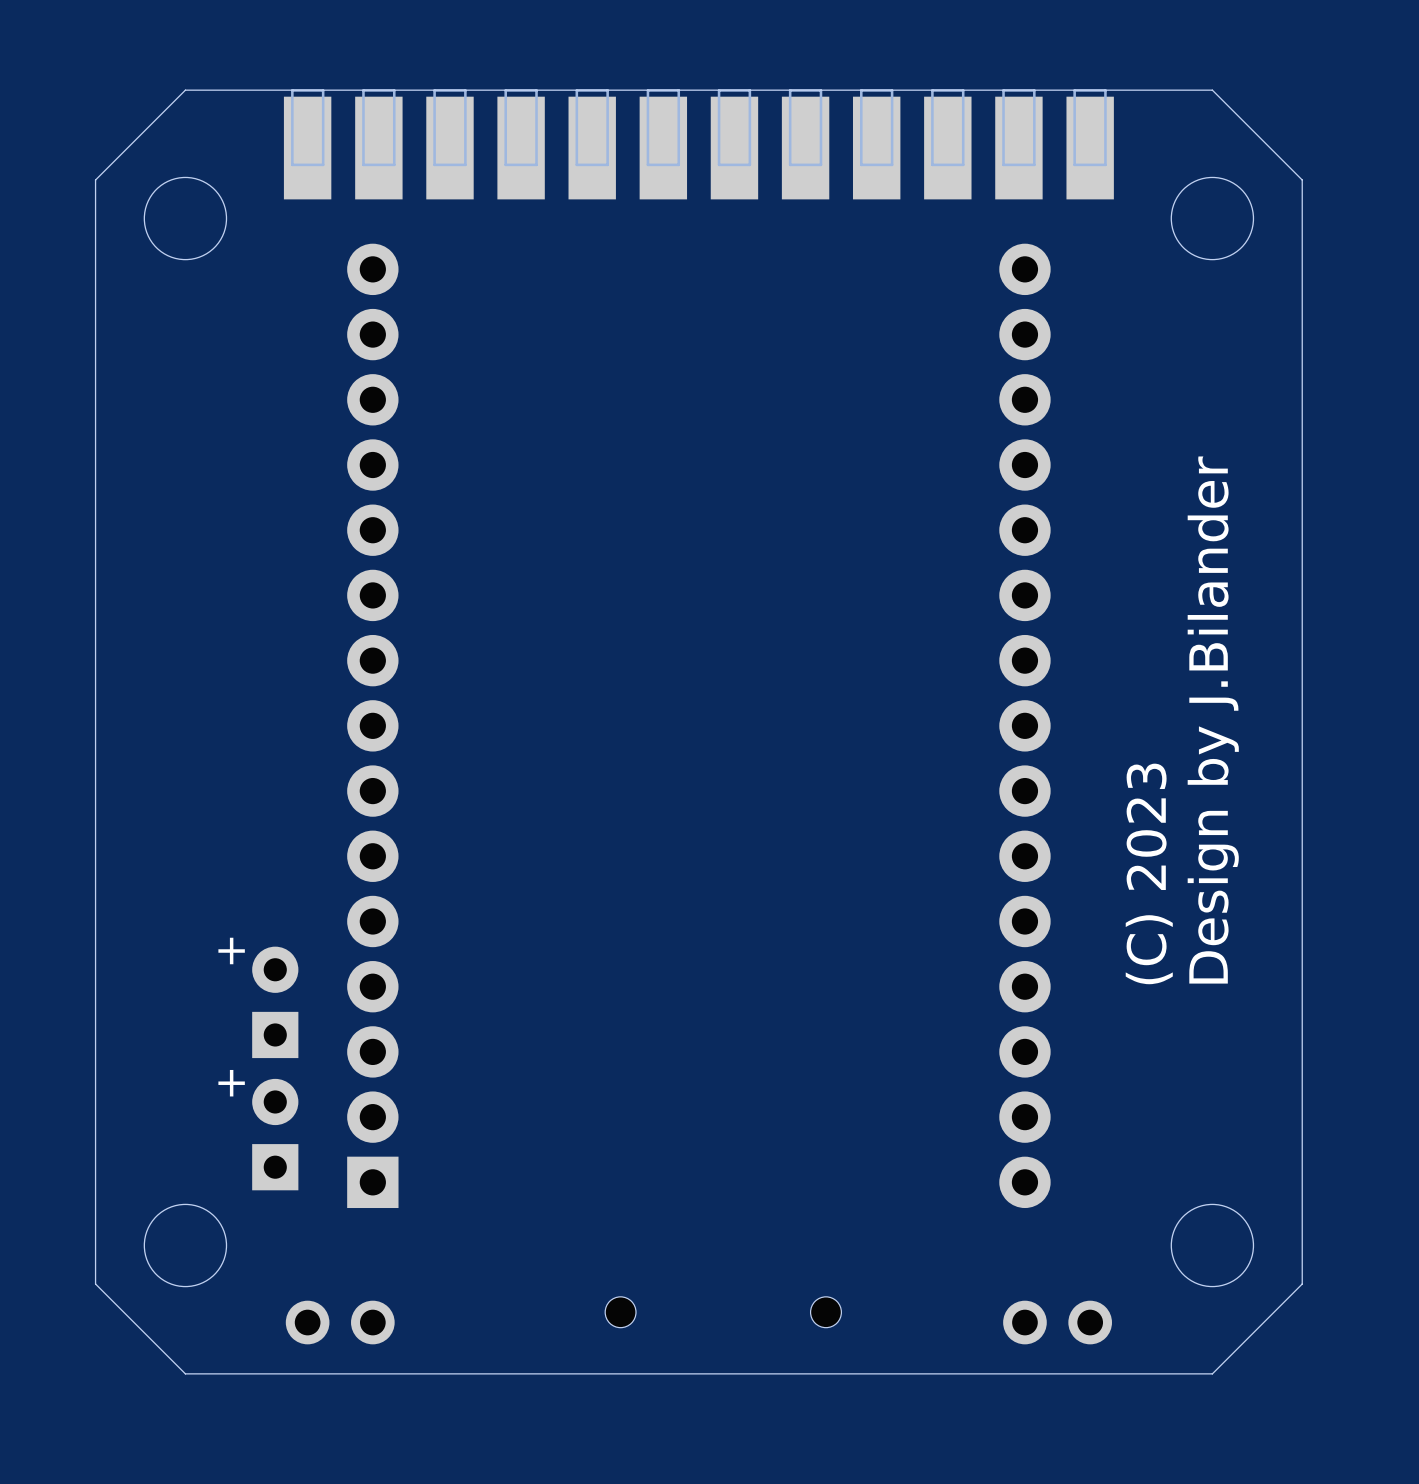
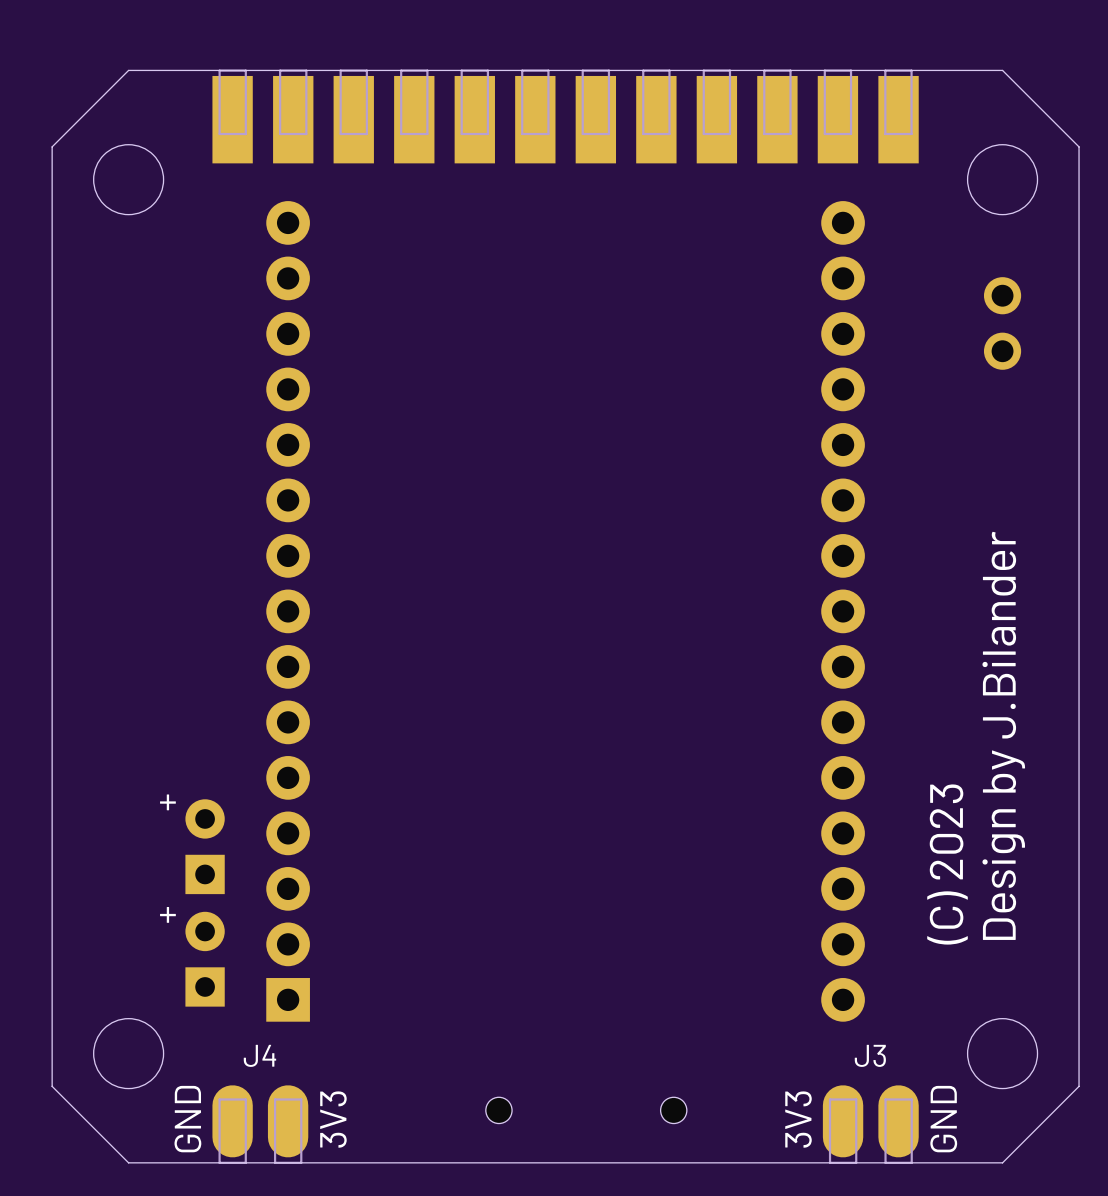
part: none -> (1002, 323)
text position: Design by J.Bilander (1213, 720) -> Design by J.Bilander (1003, 735)
text position: (C) 2023 (1149, 873) -> (C) 2023 (947, 864)
text: none -> GND (187, 1119)
part: (340, 1322) -> none
text: none -> 3V3 (333, 1119)
text: none -> 3V3 (798, 1119)
part: (1057, 1322) -> none
text: none -> GND (943, 1119)
J4: none -> (260, 1124)
J3: none -> (870, 1124)

